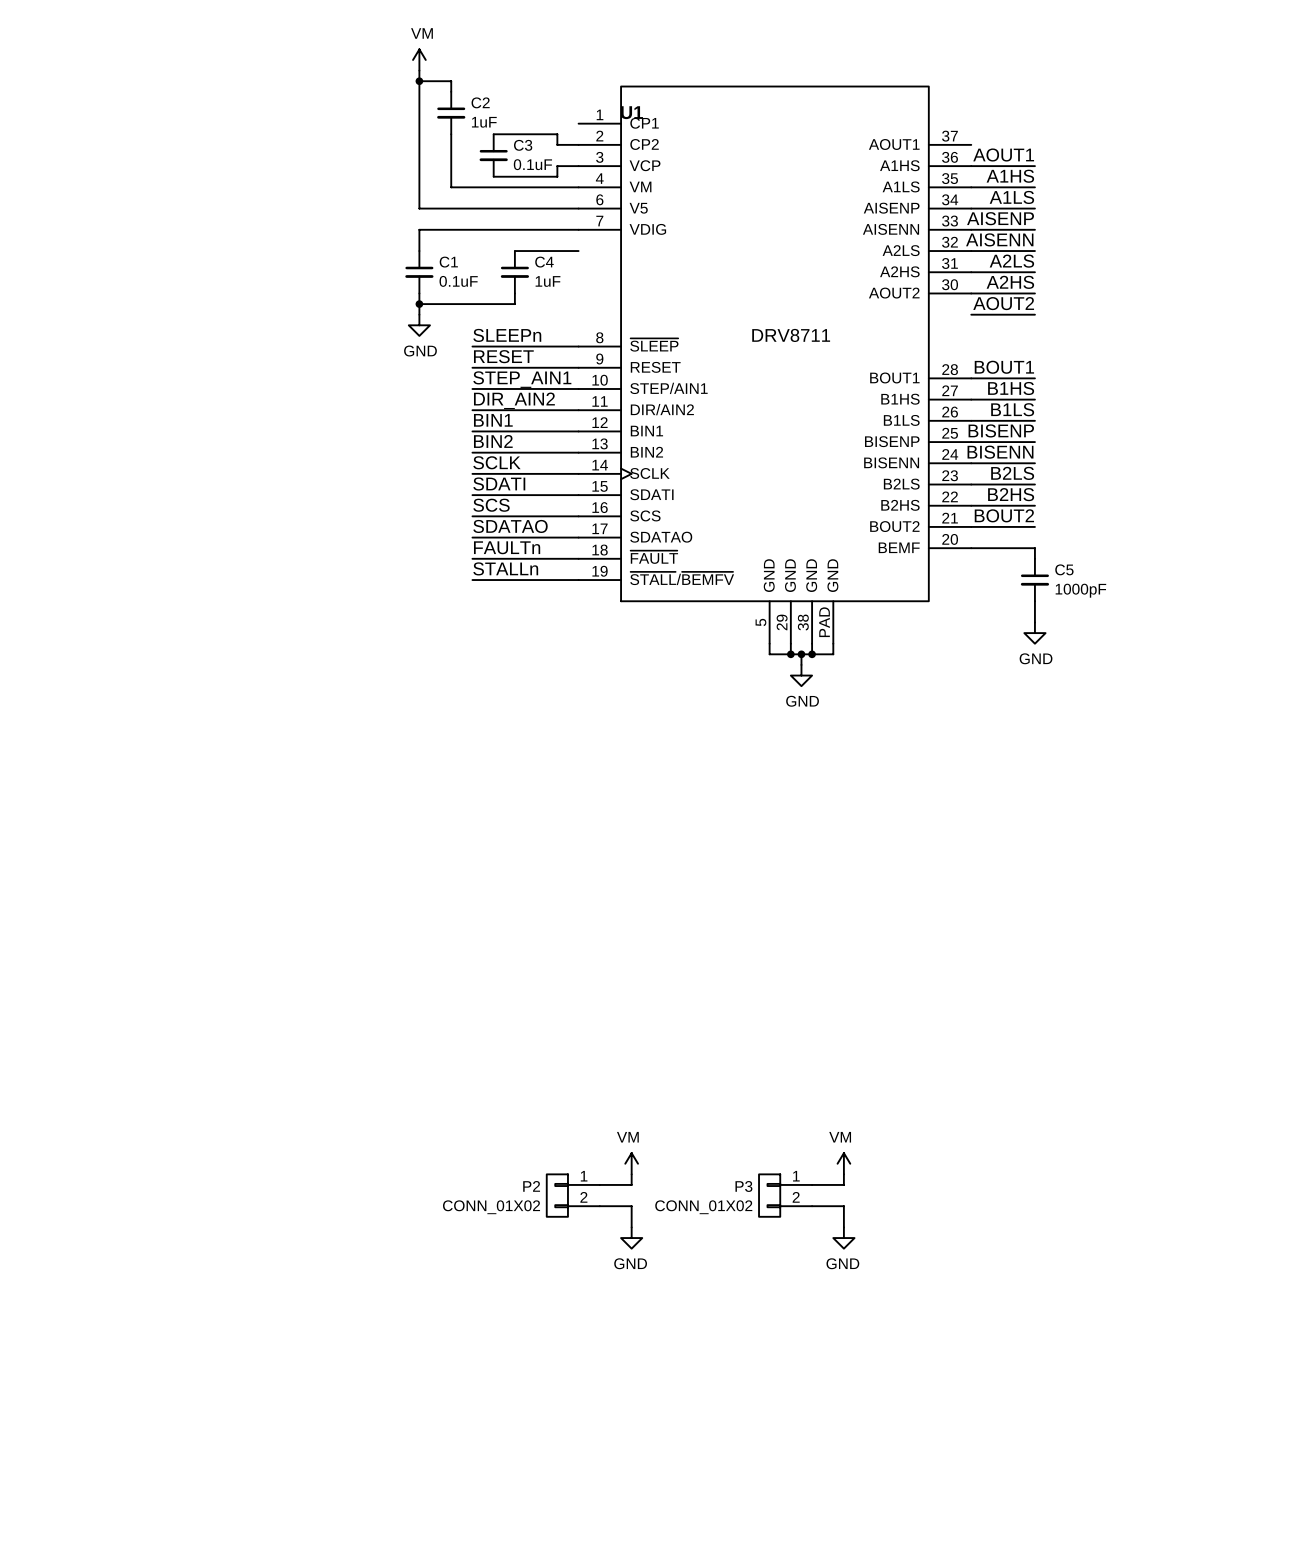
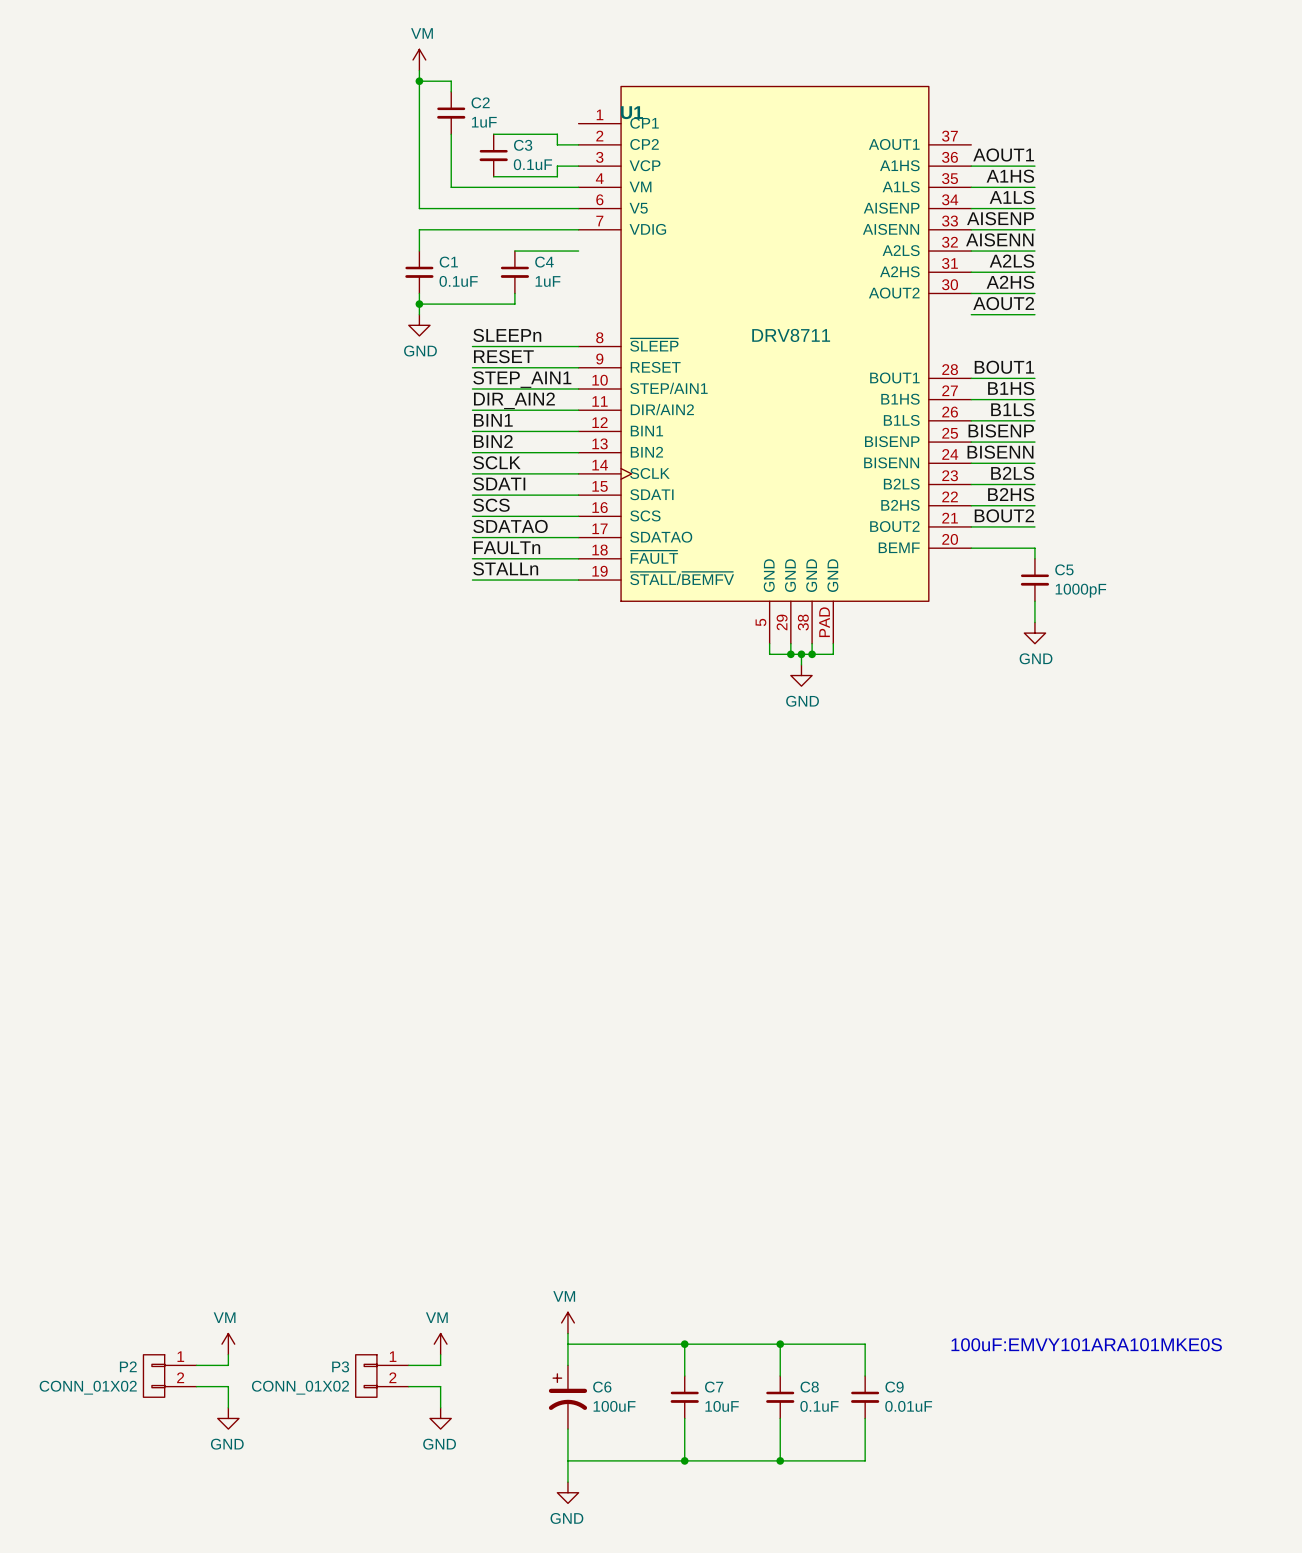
power symbol: VM (631, 1163) -> none
power symbol: VM (843, 1163) -> none
wire: (631, 1174) (631, 1184) (599, 1184) -> none
wire: (843, 1174) (843, 1184) (812, 1184) -> none
P2 position: (573, 1195) -> (169, 1376)
P3 position: (785, 1195) -> (382, 1376)
wire: (599, 1206) (631, 1206) (631, 1227) -> none
wire: (812, 1206) (843, 1206) (843, 1227) -> none
power symbol: GND (631, 1238) -> none
power symbol: GND (843, 1238) -> none
power symbol: none -> VM (567, 1322)
wire: none -> (567, 1333) (567, 1365)
power symbol: none -> VM (228, 1344)
power symbol: none -> VM (440, 1344)
wire: none -> (567, 1344) (865, 1344) (865, 1376)
wire: none -> (684, 1344) (684, 1376)
junction: none -> (684, 1344)
wire: none -> (780, 1344) (780, 1376)
junction: none -> (780, 1344)
text: none -> 100uF:EMVY101ARA101MKE0S (1086, 1344)
wire: none -> (228, 1354) (228, 1365) (196, 1365)
wire: none -> (440, 1354) (440, 1365) (408, 1365)
wire: none -> (196, 1386) (228, 1386) (228, 1407)
wire: none -> (408, 1386) (440, 1386) (440, 1407)
C6: none -> 100uF (567, 1397)
C7: none -> 10uF (684, 1397)
C8: none -> 0.1uF (780, 1397)
C9: none -> 0.01uF (865, 1397)
power symbol: none -> GND (228, 1418)
power symbol: none -> GND (440, 1418)
wire: none -> (684, 1418) (684, 1460)
wire: none -> (780, 1418) (780, 1460)
wire: none -> (865, 1418) (865, 1460) (567, 1460)
wire: none -> (567, 1429) (567, 1482)
junction: none -> (684, 1460)
junction: none -> (780, 1460)
power symbol: none -> GND (567, 1492)

